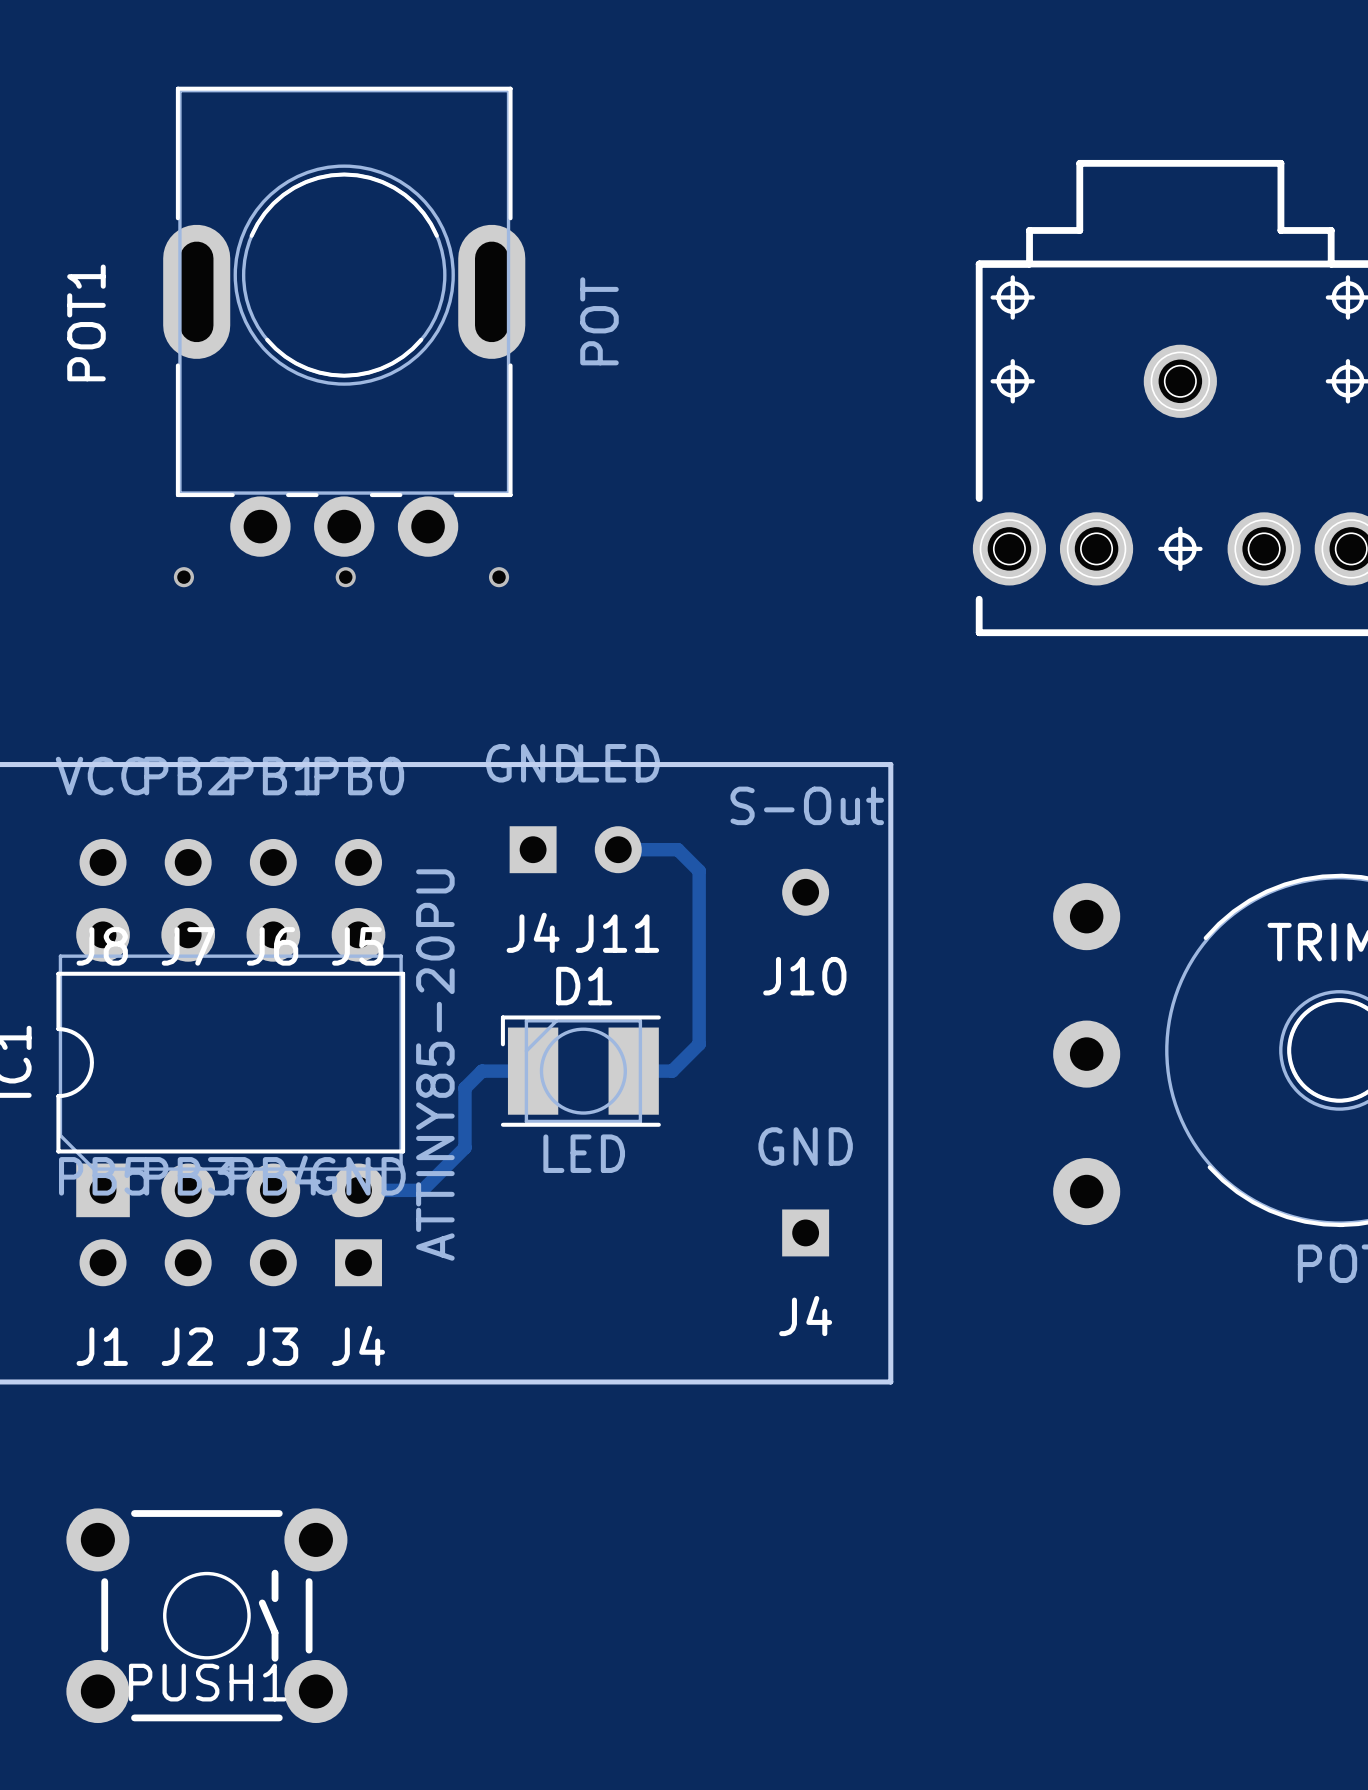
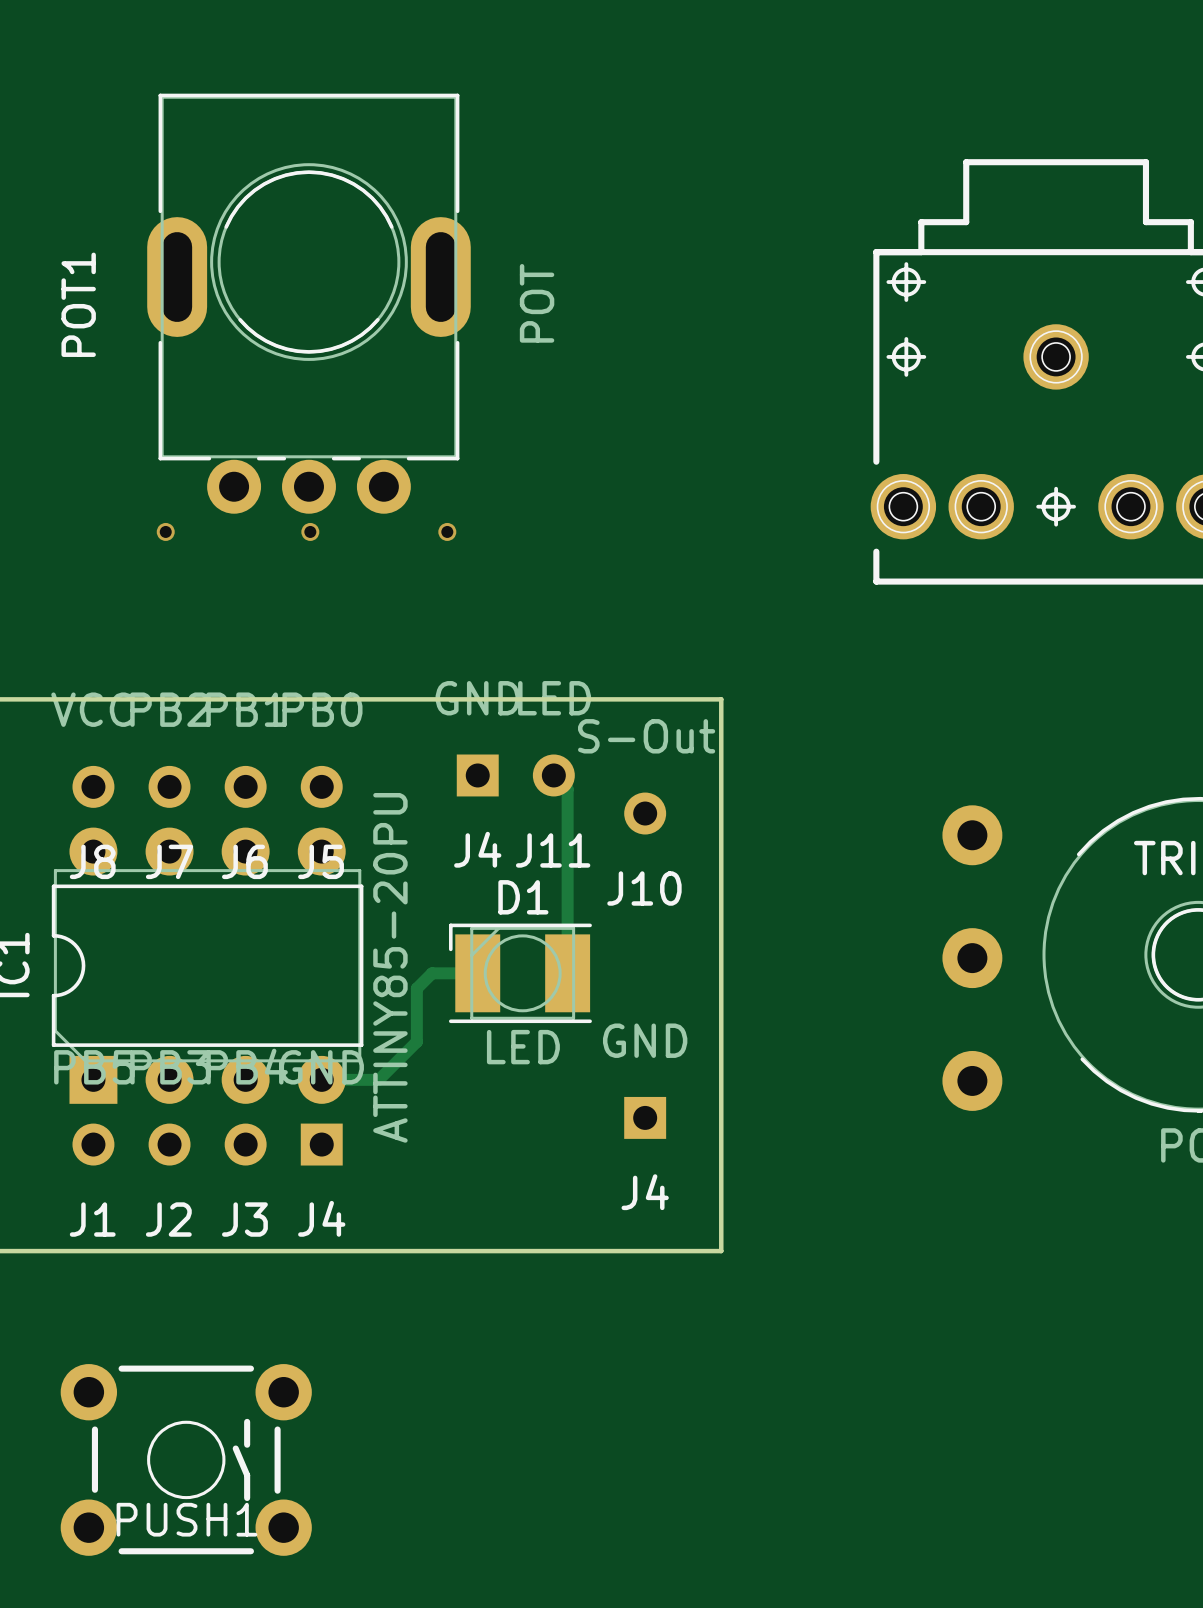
board edge: (805, 764) (890, 764) (890, 1381) (805, 1381) -> (721, 699) (721, 1251)
track: (618, 849) (677, 849) (699, 870) (699, 1044) (672, 1071) (633, 1071) -> (553, 775) (567, 789) (567, 973)
J10 position: (805, 892) -> (645, 813)
J4 position: (805, 1232) -> (645, 1117)

